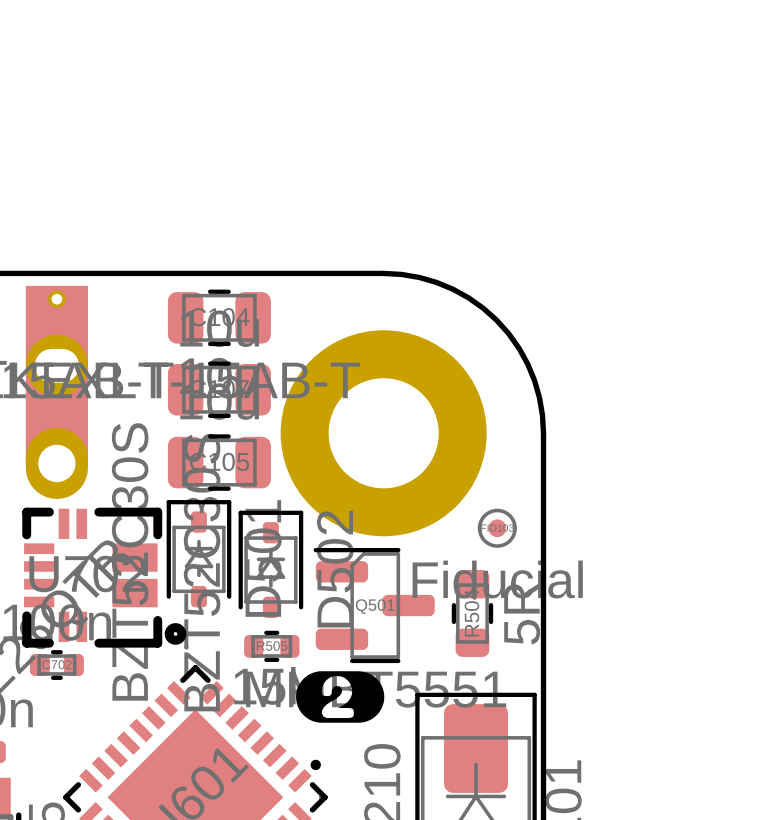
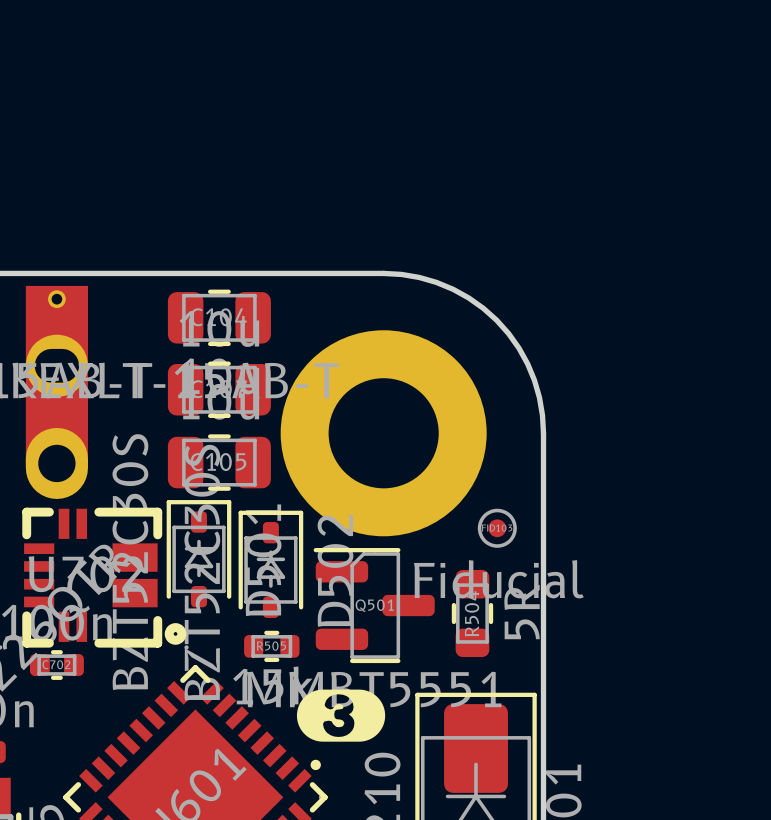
drawing shape: [296, 671, 385, 723] -> [296, 689, 386, 742]

